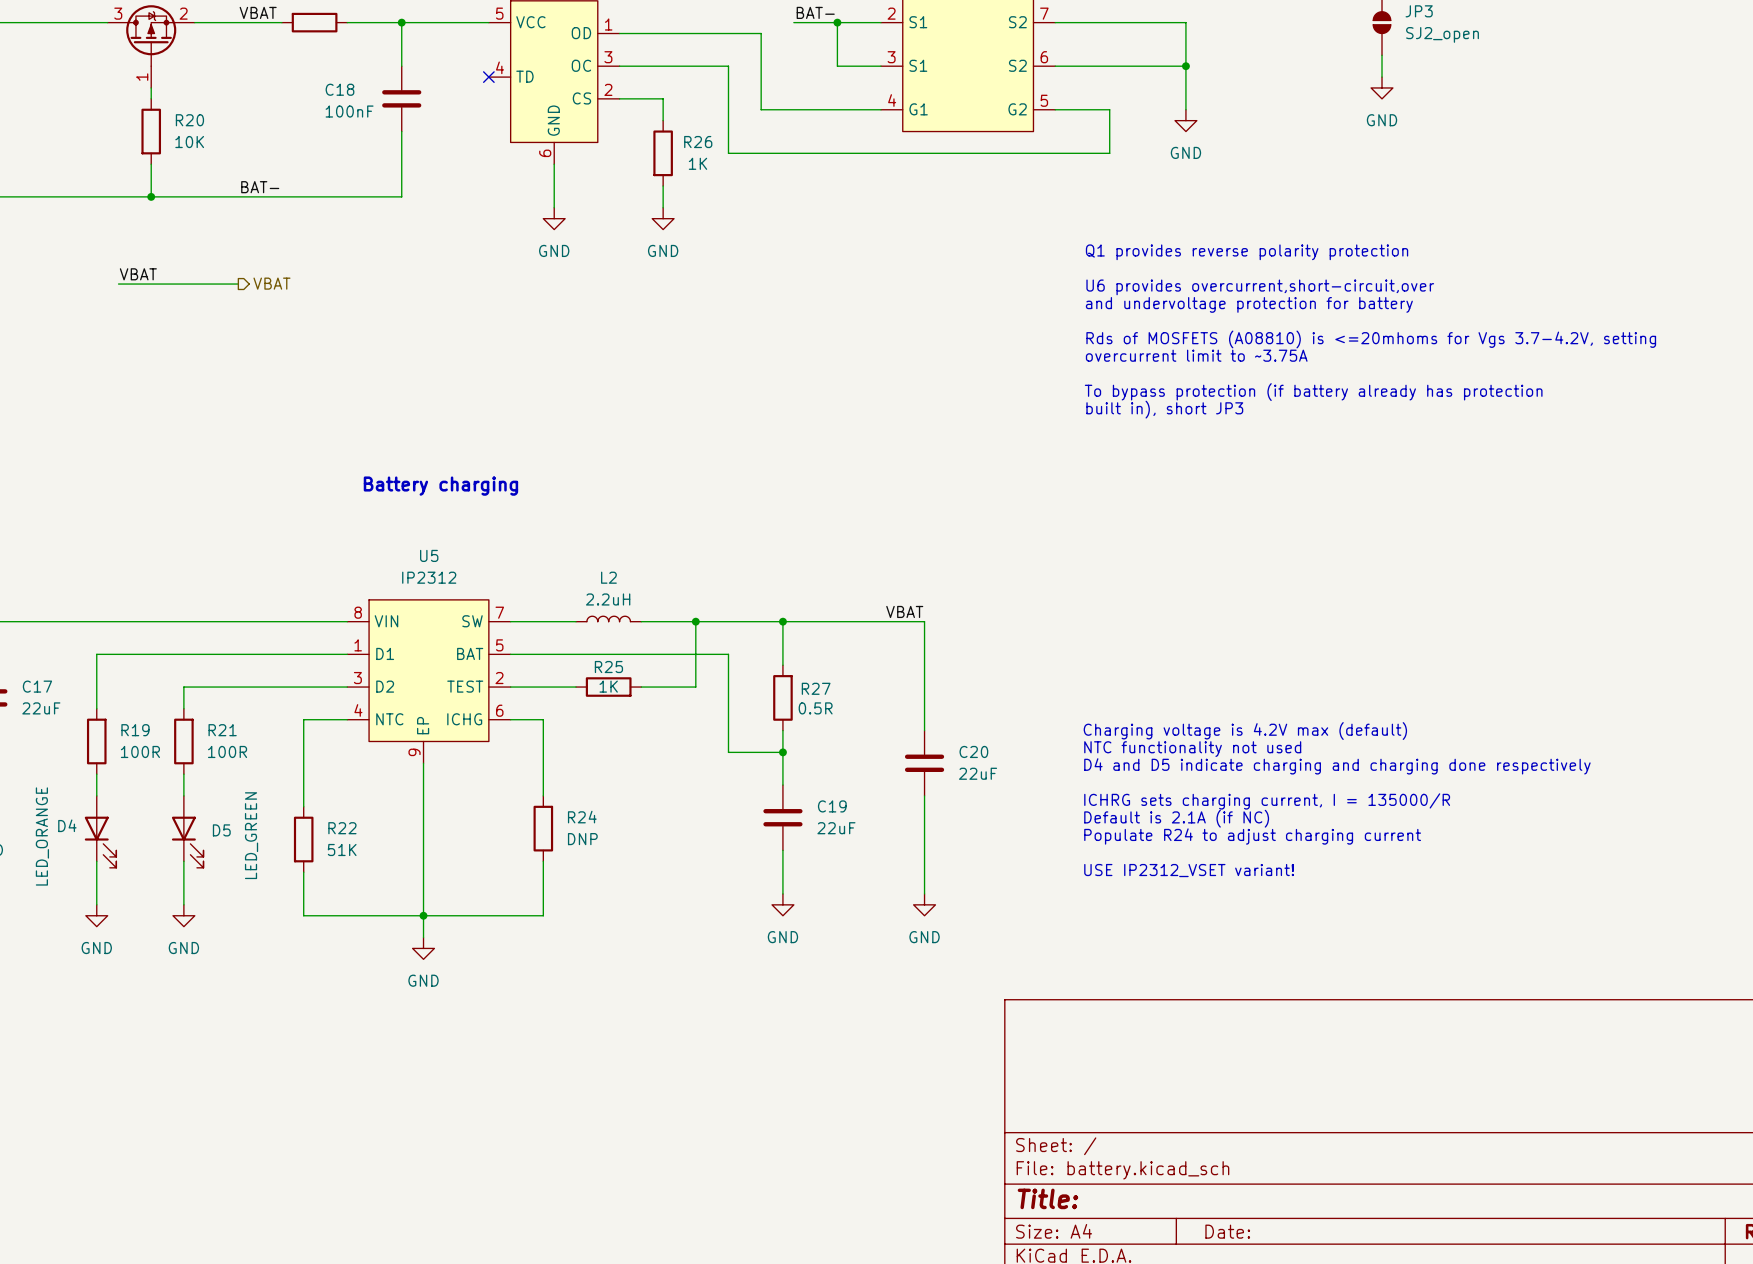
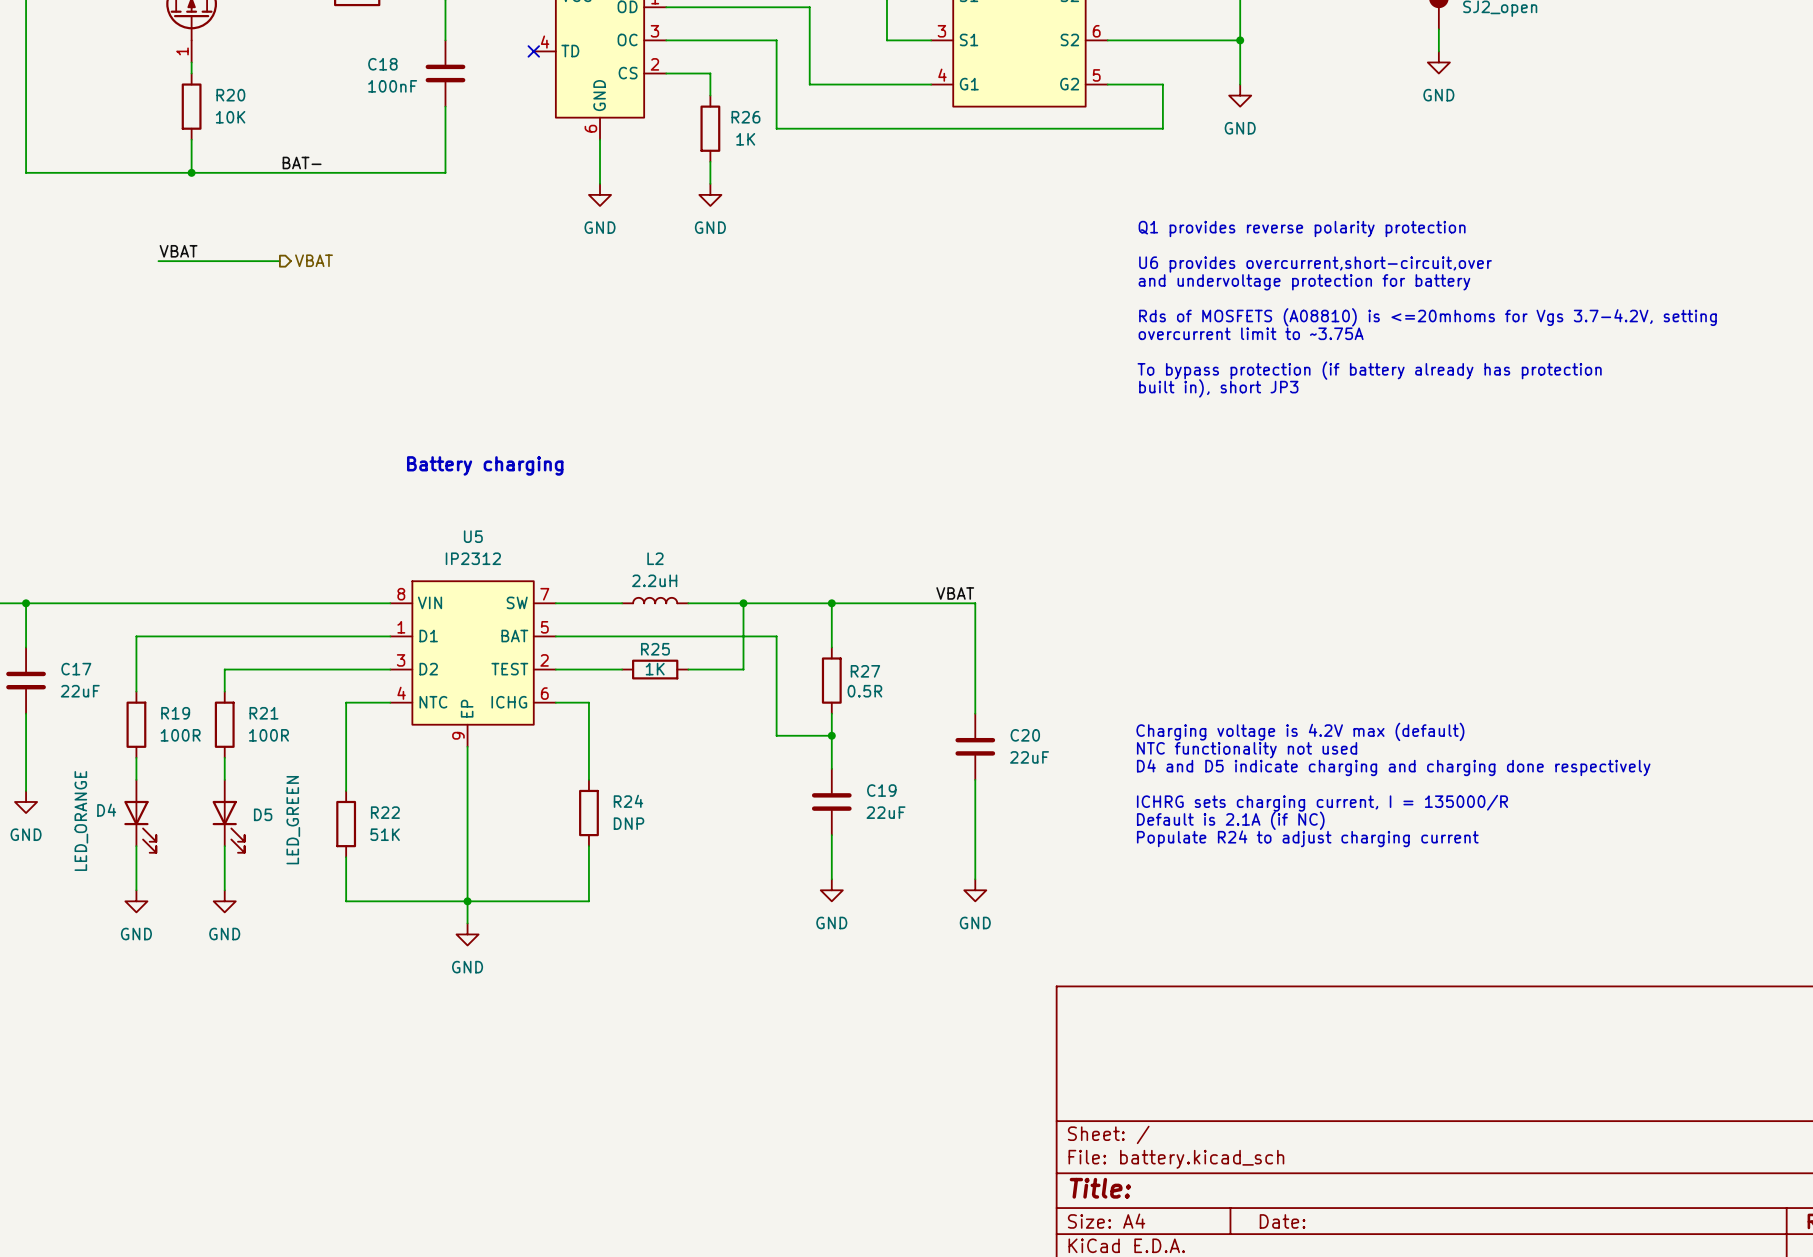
text: Charging voltage is 4.2V max (default) (1245, 731) -> none
text: NTC functionality not used (1192, 749) -> Charging voltage is 4.2V max (default) (1300, 731)
text: D4 and D5 indicate charging and charging done respectively (1337, 766) -> NTC functionality not used (1247, 750)
text: none -> D4 and D5 indicate charging and charging done respectively (1393, 767)
text: ICHRG sets charging current, I = 135000/R (1267, 801) -> none
text: Default is 2.1A (if NC) (1176, 818) -> ICHRG sets charging current, I = 135000/R (1322, 803)
text: Populate R24 to adjust charging current (1252, 836) -> Default is 2.1A (if NC) (1230, 820)
text: none -> Populate R24 to adjust charging current (1307, 838)
text: USE IP2312_VSET variant! (1189, 870) -> none

